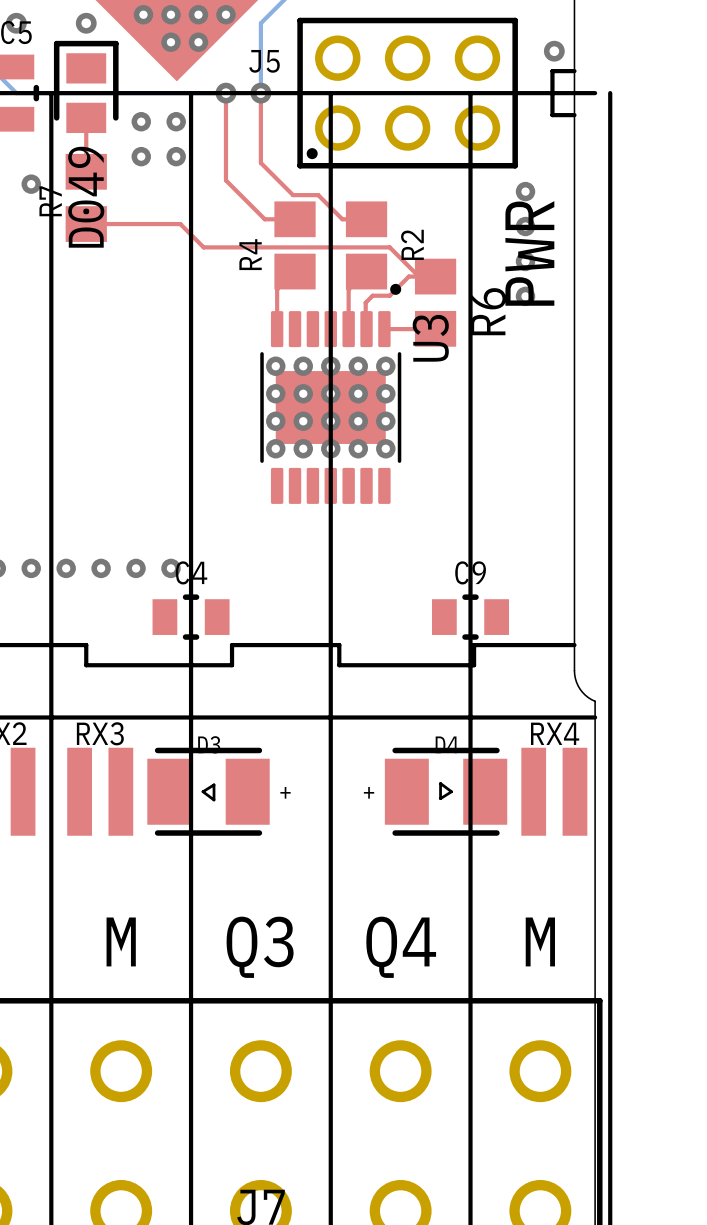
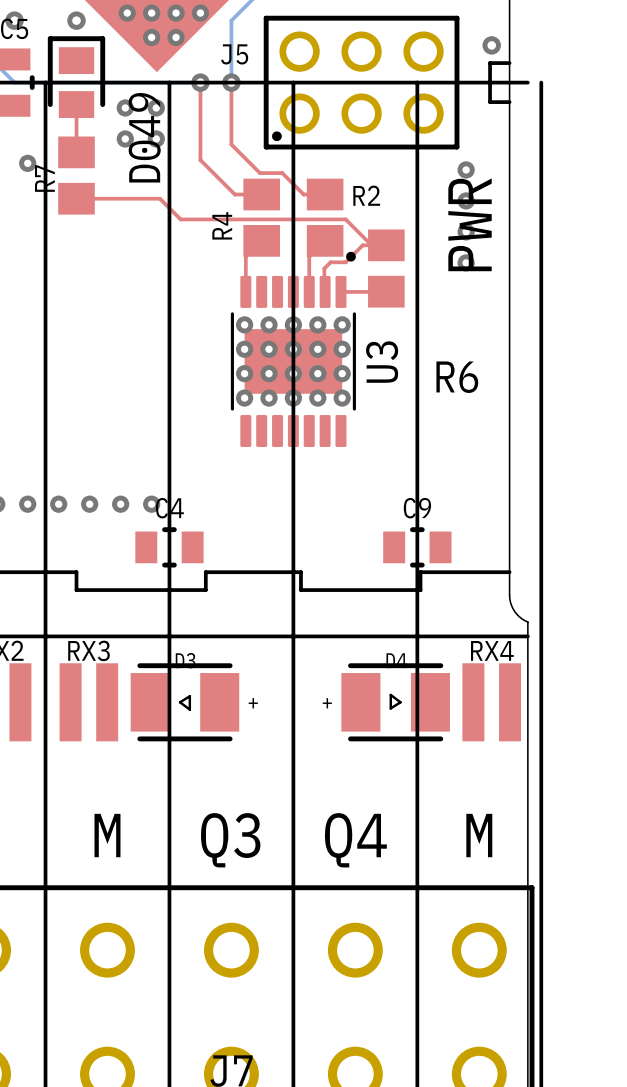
D049 name position: D049 (86, 197) -> D049 (144, 137)
R2 name rotation: 0° (412, 244) -> 90° clockwise (366, 195)
R6 name rotation: 0° (488, 311) -> 90° clockwise (457, 377)
R6 name position: R6 (488, 311) -> R6 (457, 377)
U3 name position: U3 (430, 338) -> U3 (382, 362)

